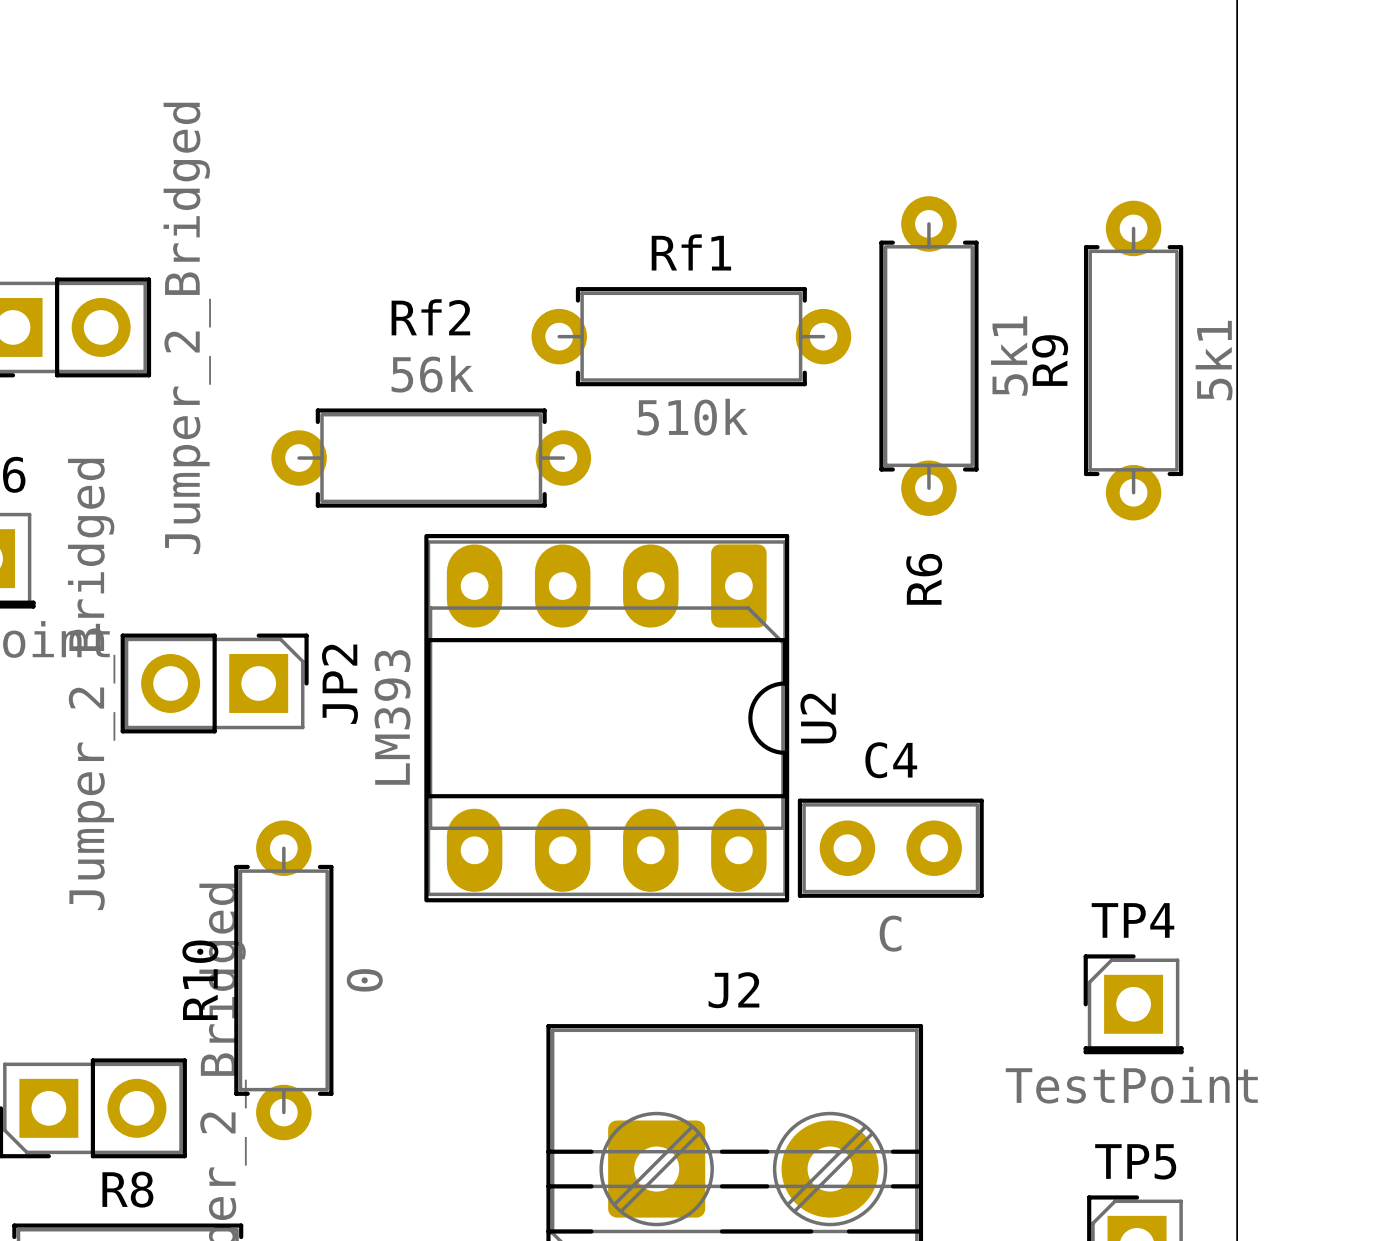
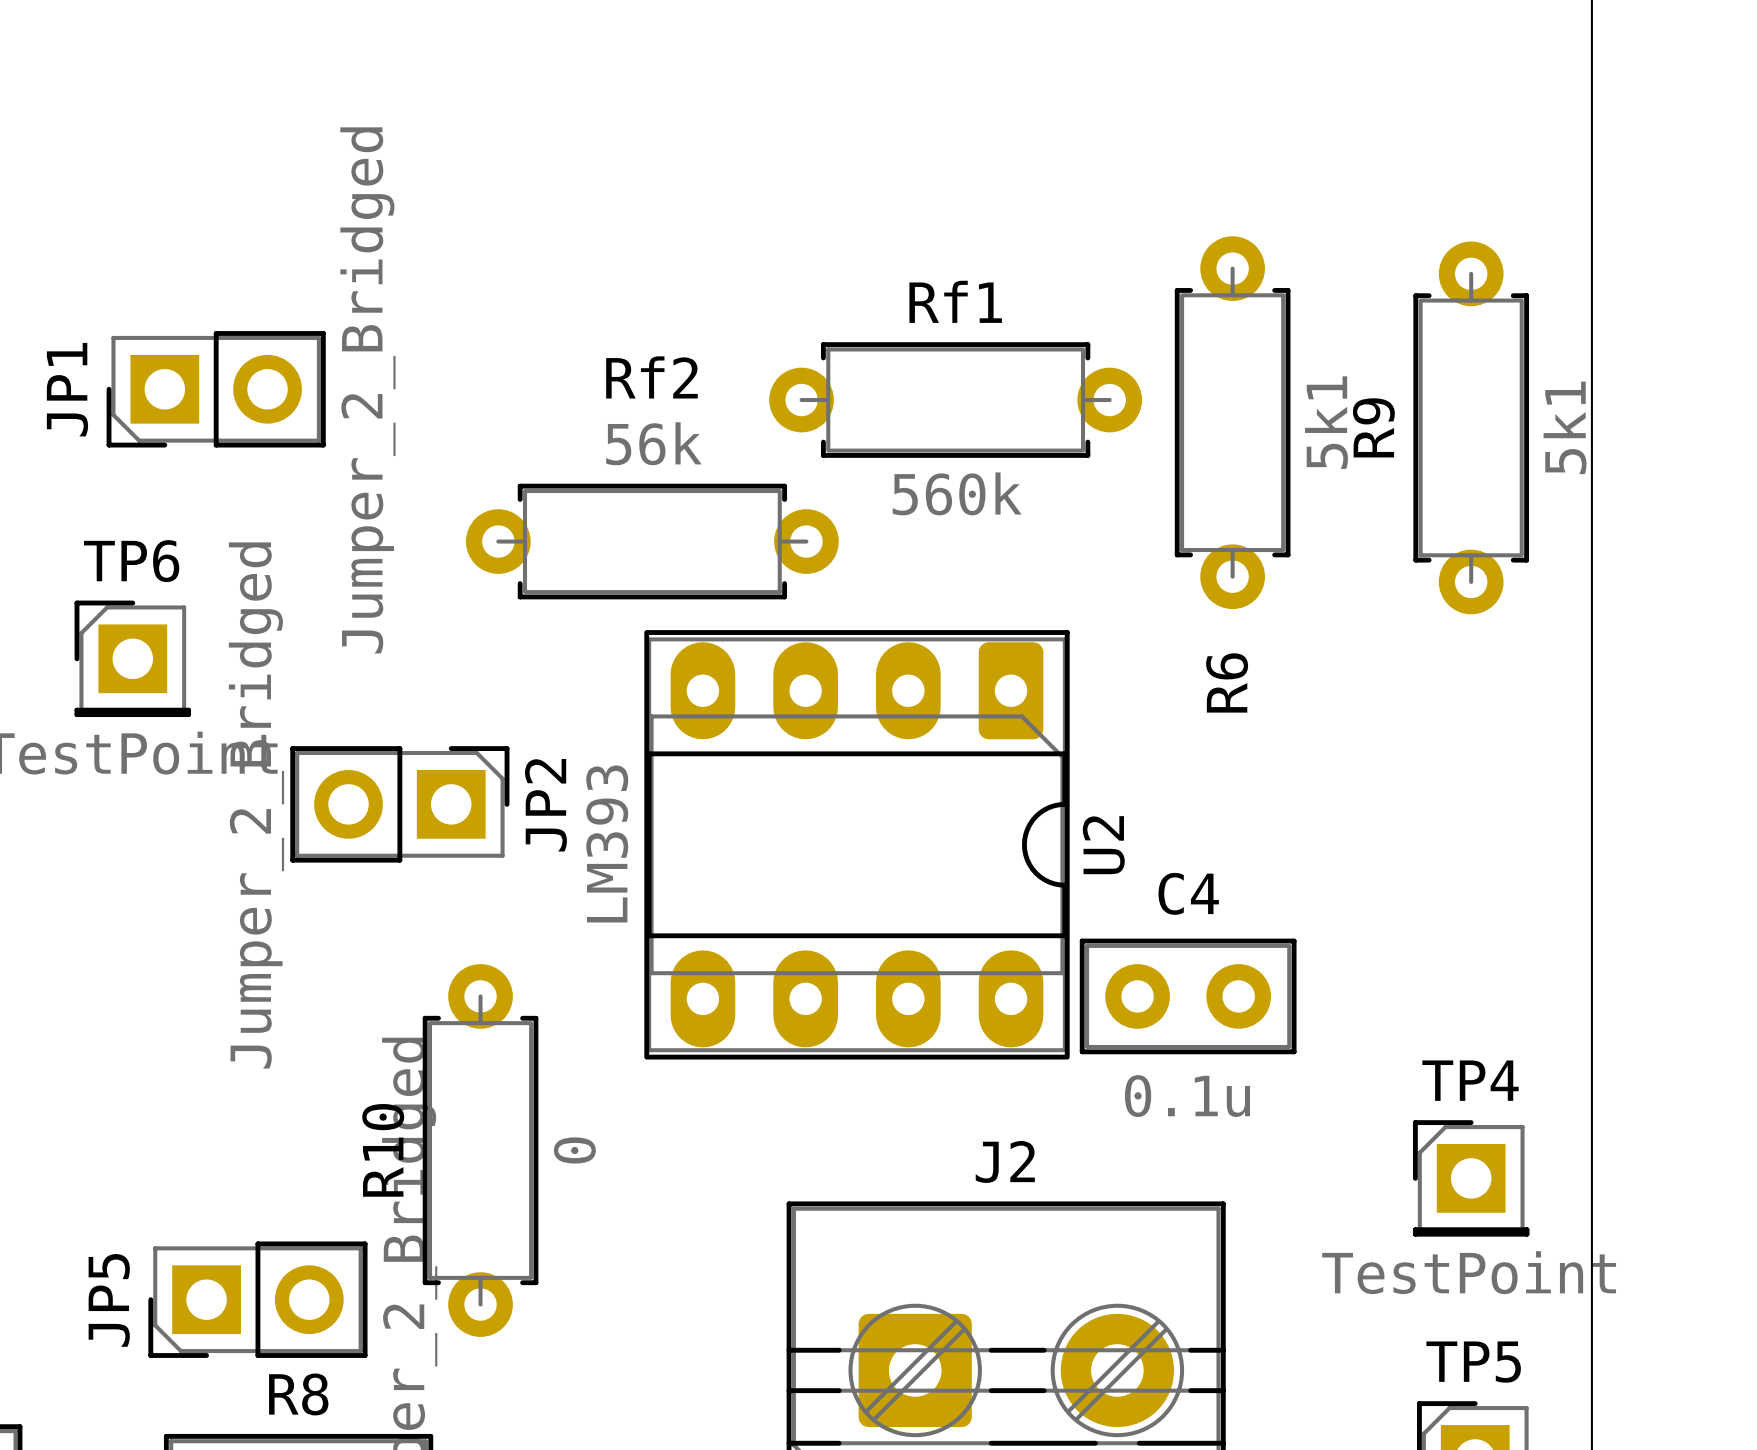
Rf1 value: 510k (692, 417) -> 560k (957, 493)
C4 value: C (890, 933) -> 0.1u (1187, 1096)

